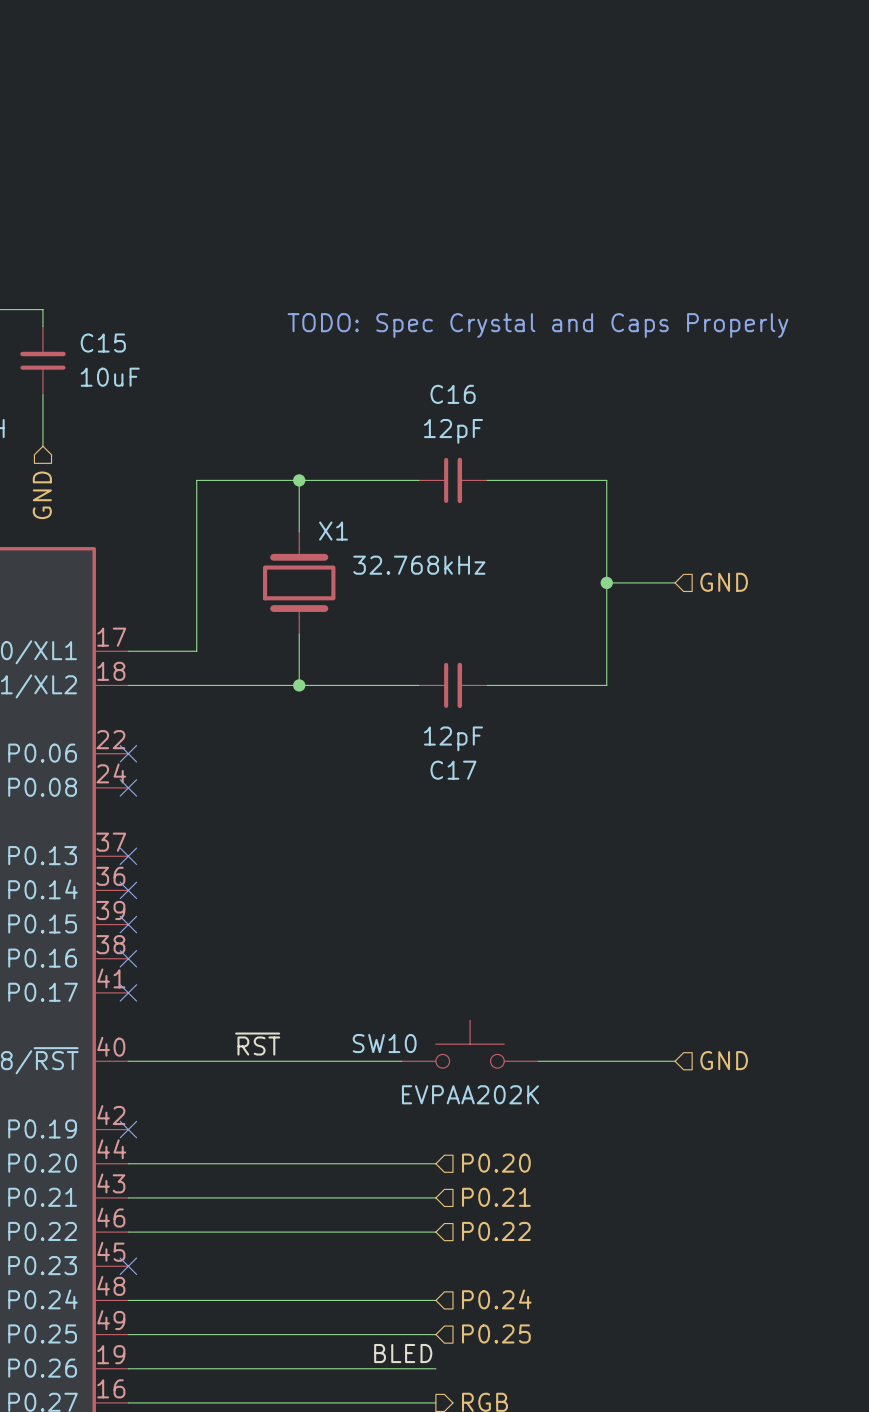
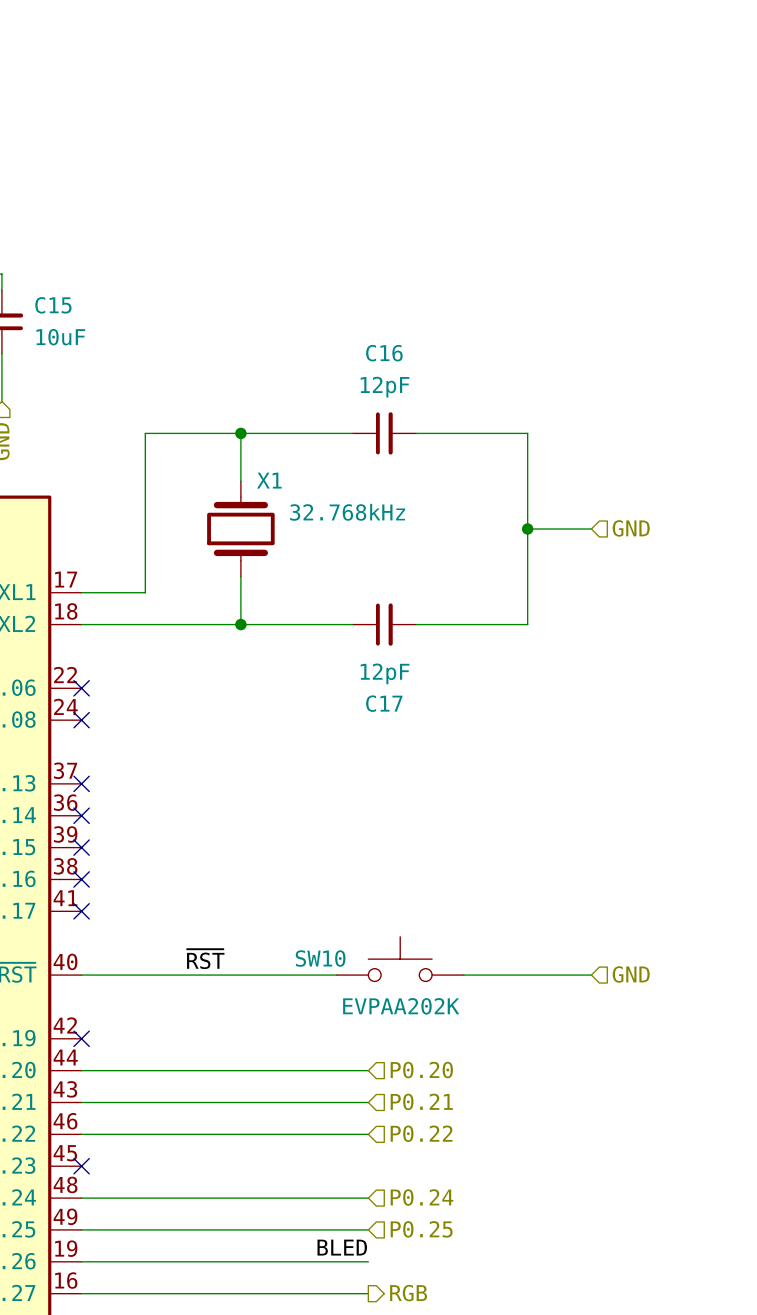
text: TODO: Spec Crystal and Caps Properly (537, 325) -> none

